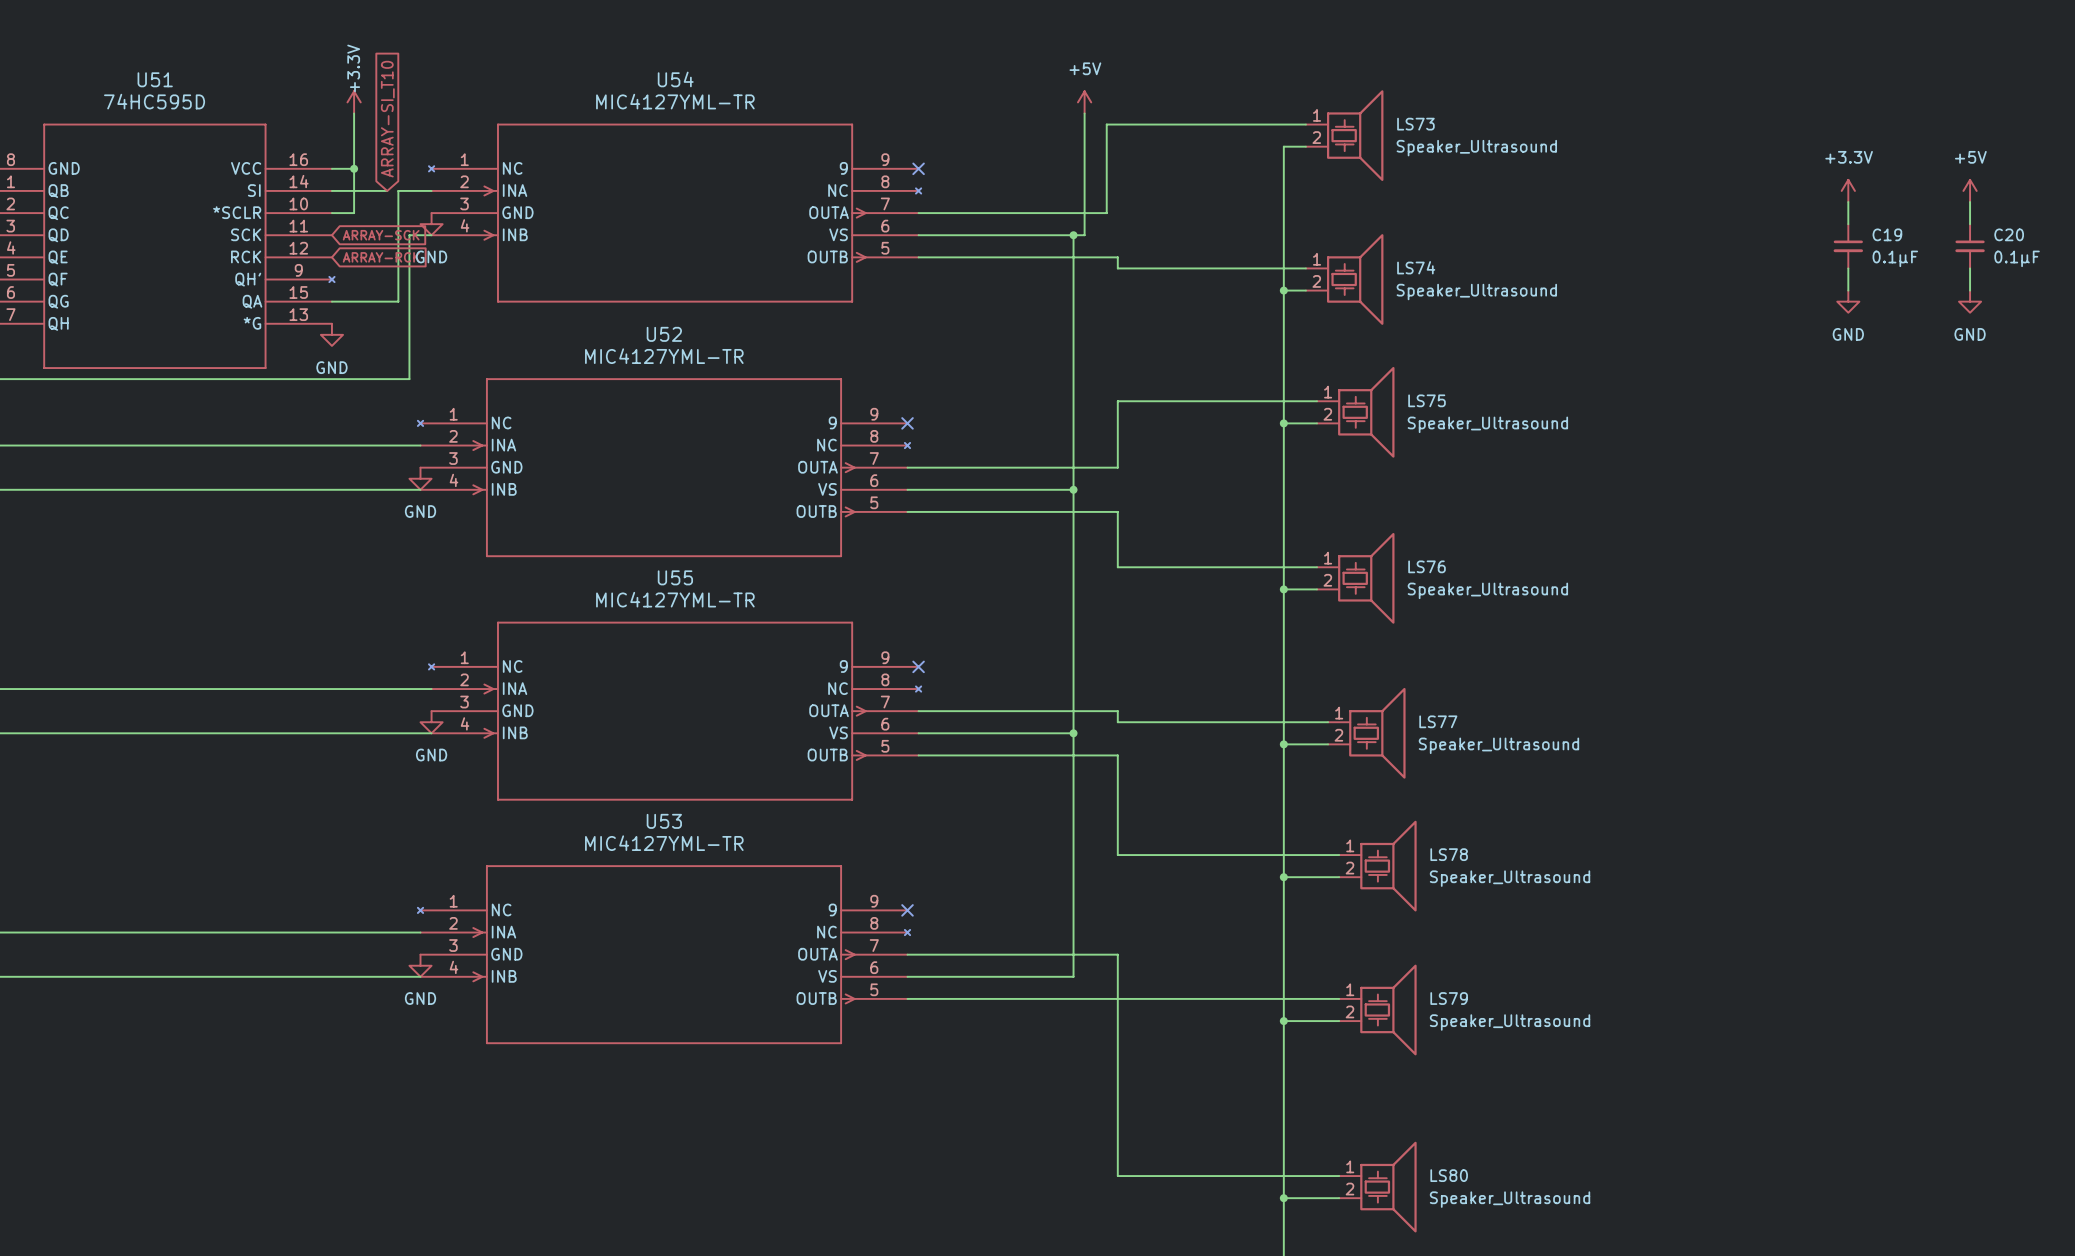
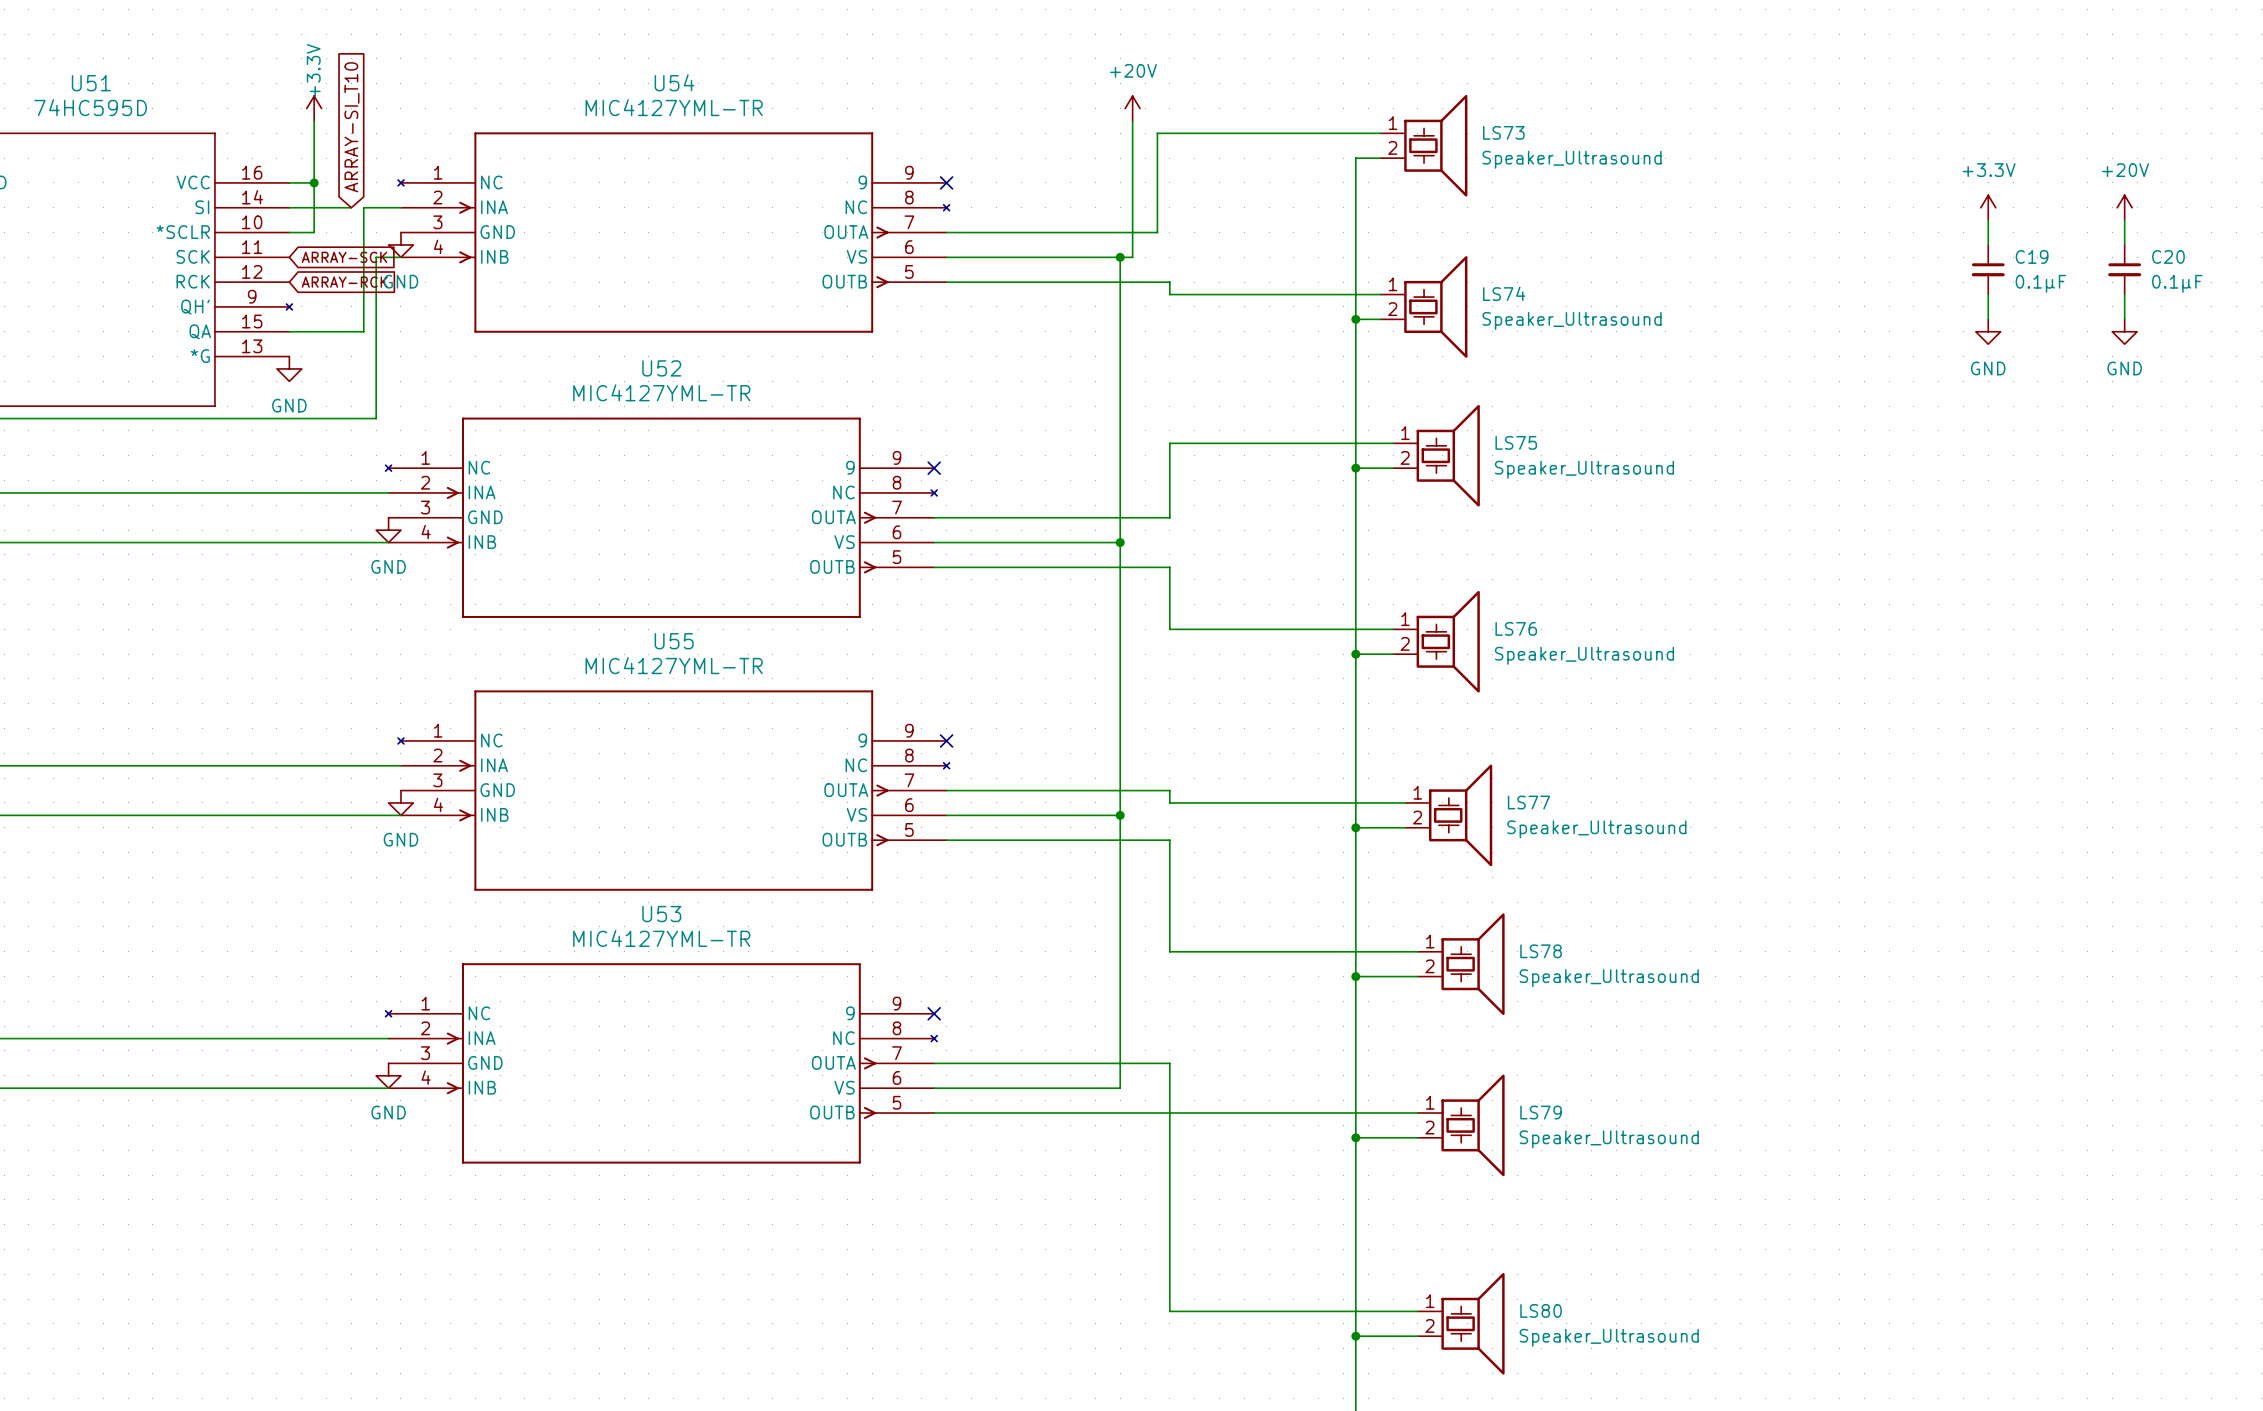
power symbol: +5V (1084, 102) -> +20V (1132, 108)
power symbol: +5V (1970, 190) -> +20V (2124, 207)

